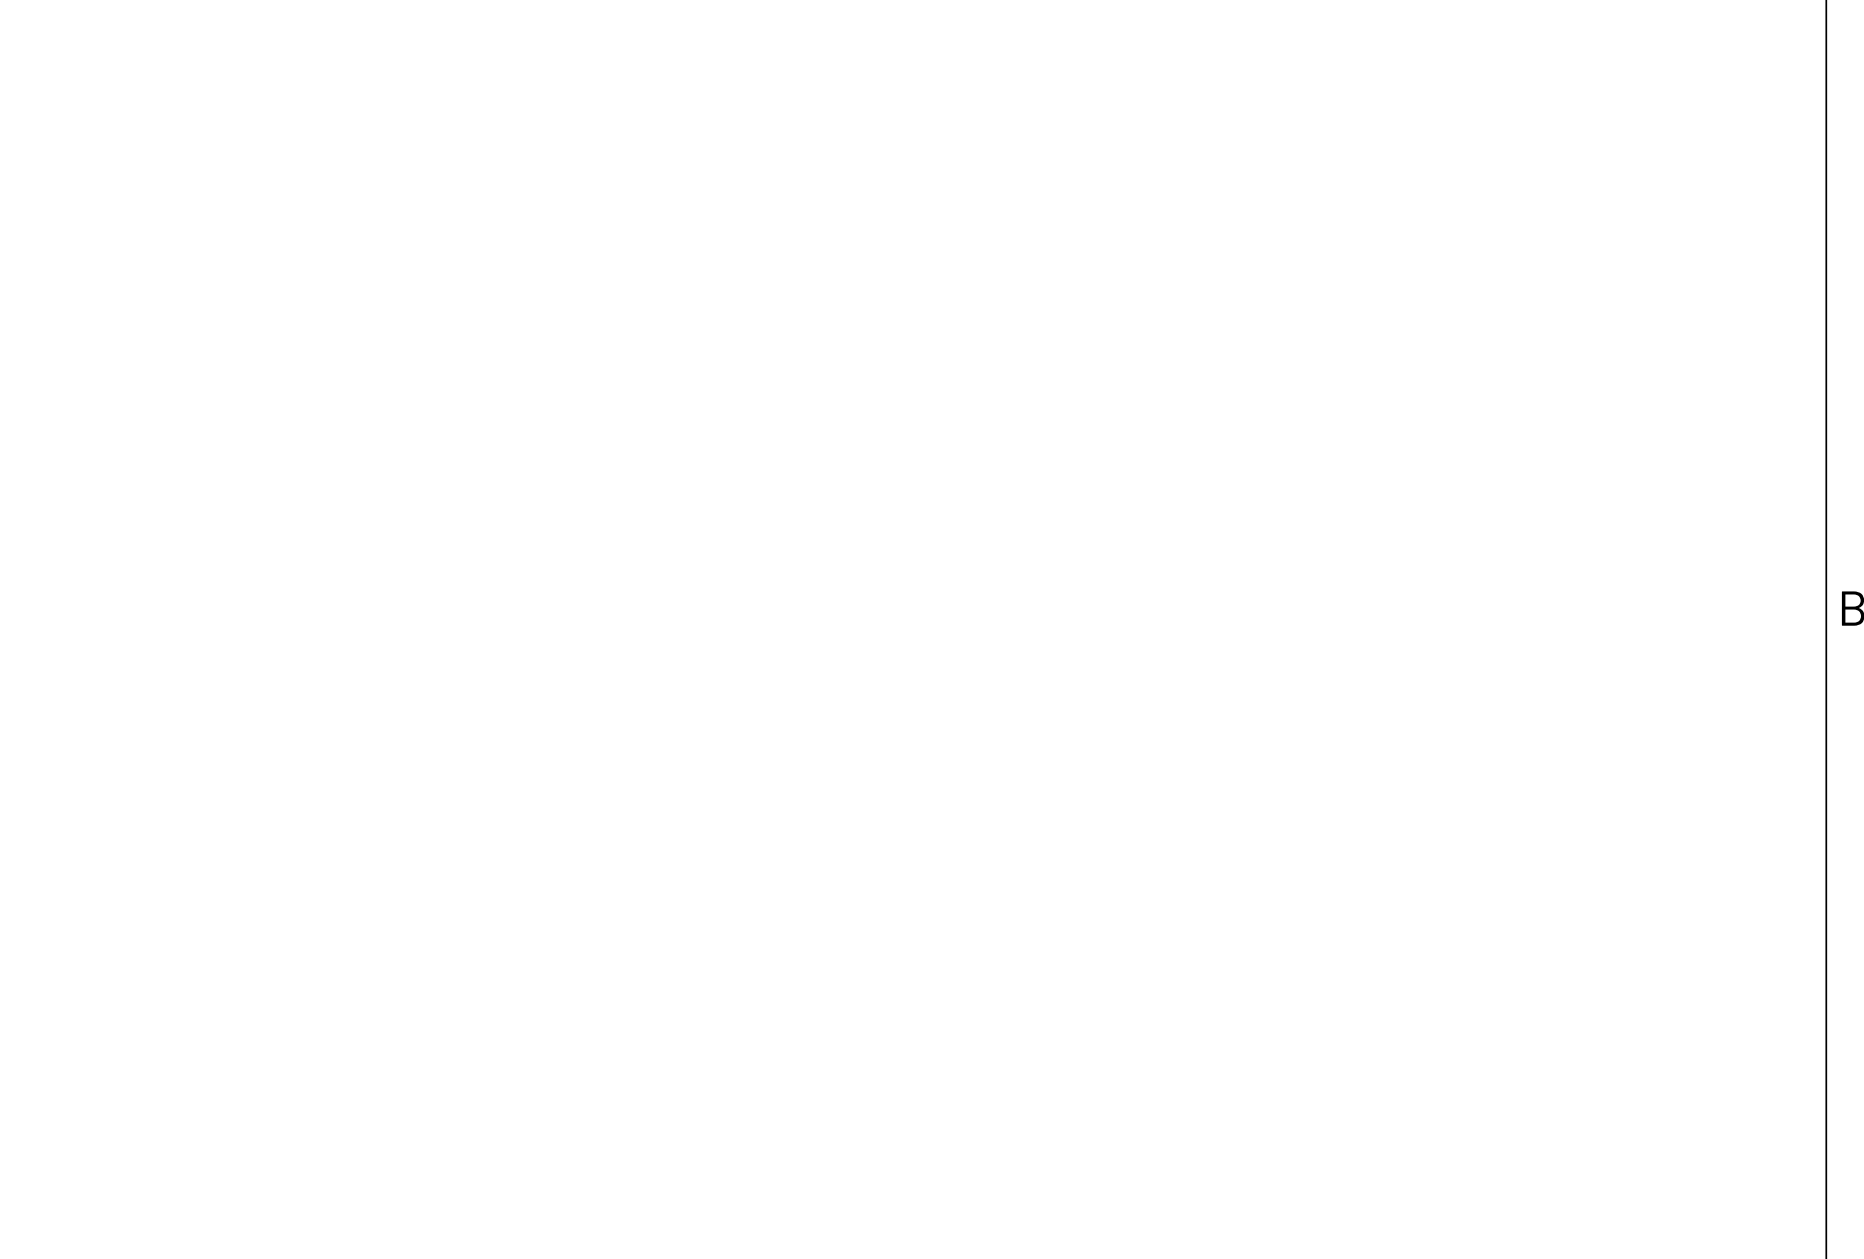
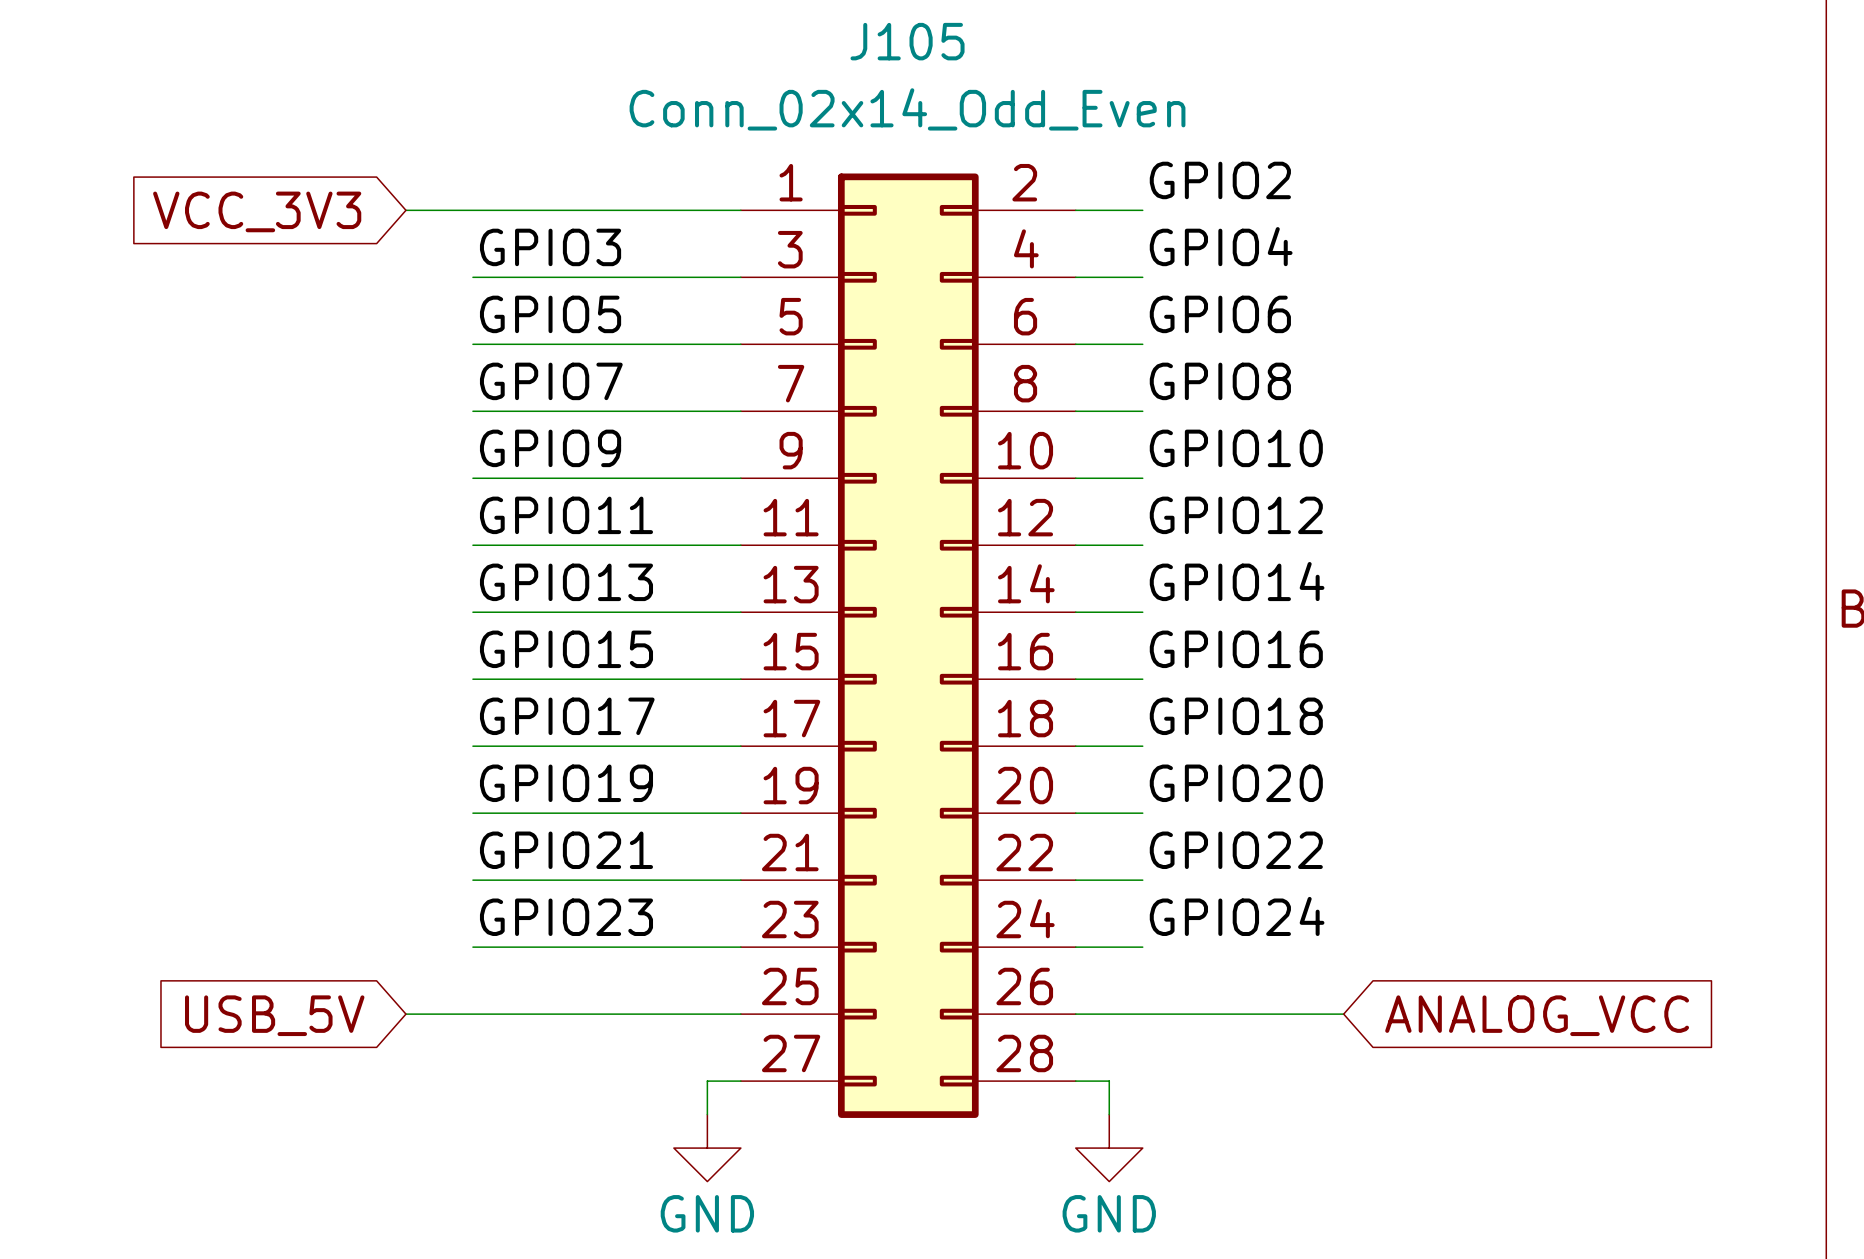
label: none -> GPIO2 (1220, 180)
global label: none -> VCC_3V3 (257, 211)
wire: none -> (405, 210) (740, 210)
wire: none -> (1075, 210) (1142, 210)
label: none -> GPIO3 (550, 247)
label: none -> GPIO4 (1221, 246)
wire: none -> (472, 277) (740, 277)
wire: none -> (1075, 277) (1142, 277)
label: none -> GPIO5 (550, 314)
label: none -> GPIO6 (1220, 314)
wire: none -> (472, 344) (740, 344)
wire: none -> (1075, 344) (1142, 344)
label: none -> GPIO7 (551, 381)
label: none -> GPIO8 (1220, 381)
wire: none -> (472, 411) (740, 411)
wire: none -> (1075, 411) (1142, 411)
label: none -> GPIO9 (550, 448)
label: none -> GPIO10 (1236, 448)
wire: none -> (472, 478) (740, 478)
wire: none -> (1075, 478) (1142, 478)
label: none -> GPIO11 (566, 515)
label: none -> GPIO12 (1236, 515)
wire: none -> (472, 545) (740, 545)
wire: none -> (1075, 545) (1142, 545)
label: none -> GPIO13 (566, 582)
label: none -> GPIO14 (1237, 581)
wire: none -> (472, 612) (740, 612)
wire: none -> (1075, 612) (1142, 612)
J105: none -> Conn_02x14_Odd_Even (908, 645)
label: none -> GPIO15 (566, 649)
label: none -> GPIO16 (1236, 649)
wire: none -> (472, 679) (740, 679)
wire: none -> (1075, 679) (1142, 679)
label: none -> GPIO17 (567, 716)
label: none -> GPIO18 (1236, 716)
wire: none -> (472, 746) (740, 746)
wire: none -> (1075, 746) (1142, 746)
label: none -> GPIO19 (566, 783)
label: none -> GPIO20 (1236, 783)
wire: none -> (472, 813) (740, 813)
wire: none -> (1075, 813) (1142, 813)
label: none -> GPIO21 (566, 850)
label: none -> GPIO22 (1236, 850)
wire: none -> (472, 880) (740, 880)
wire: none -> (1075, 880) (1142, 880)
label: none -> GPIO23 (566, 917)
label: none -> GPIO24 (1237, 916)
wire: none -> (472, 947) (740, 947)
wire: none -> (1075, 947) (1142, 947)
global label: none -> USB_5V (274, 1015)
wire: none -> (405, 1014) (740, 1014)
wire: none -> (1075, 1014) (1343, 1014)
global label: none -> ANALOG_VCC (1537, 1015)
wire: none -> (740, 1081) (707, 1081) (707, 1114)
wire: none -> (1075, 1081) (1109, 1081) (1109, 1114)
power symbol: none -> GND (707, 1148)
power symbol: none -> GND (1109, 1148)

